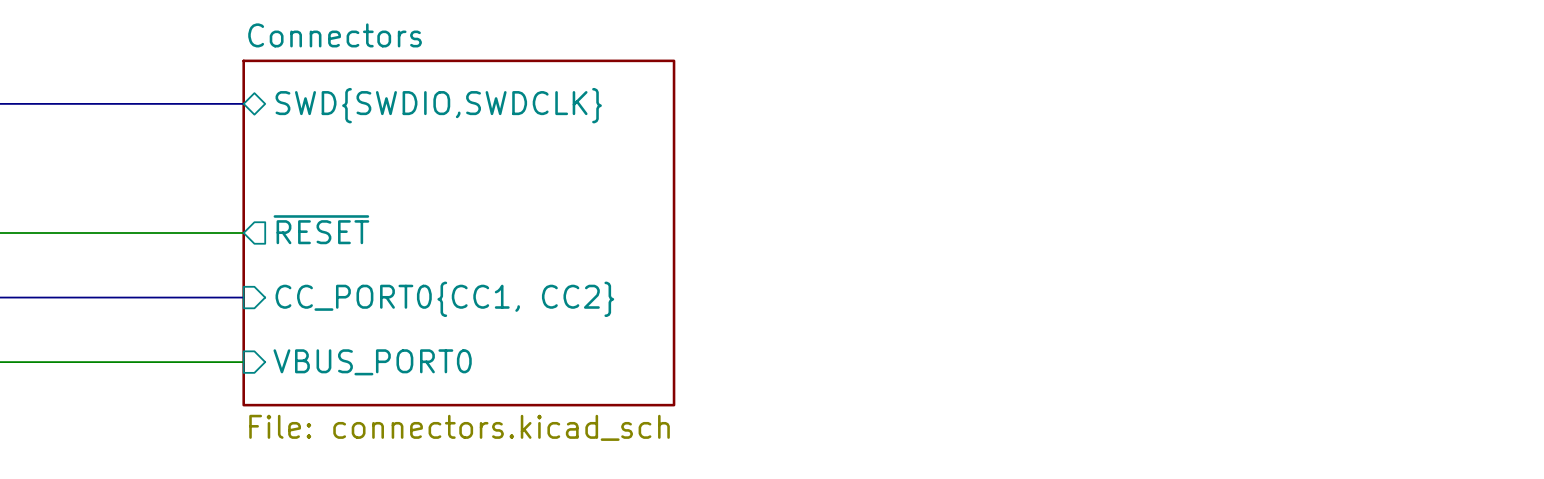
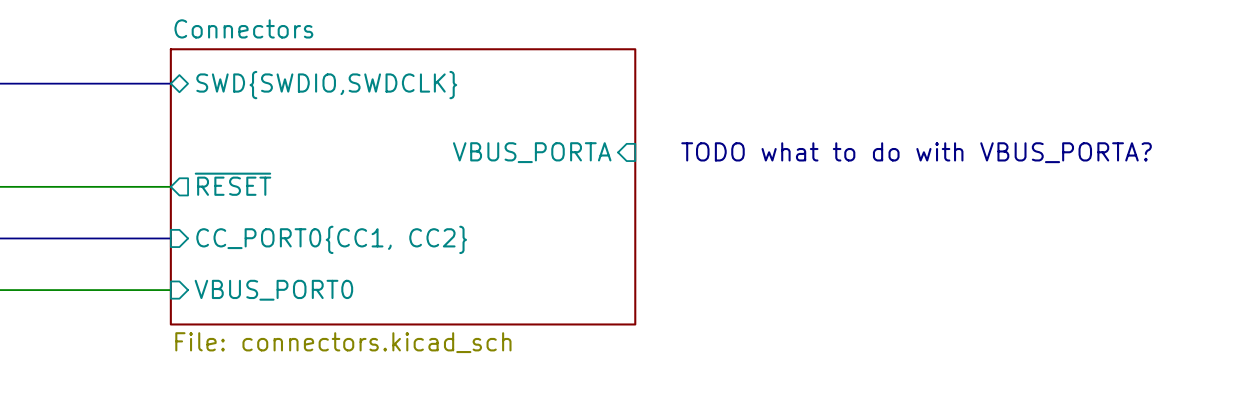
sheet pin: none -> VBUS_PORTA (532, 152)
text: none -> TODO what to do with VBUS_PORTA? (916, 152)
sheet Connectors: File: connectors.kicad_sch (458, 233) -> none
sheet Connectors: none -> File: connectors.kicad_sch (403, 186)

